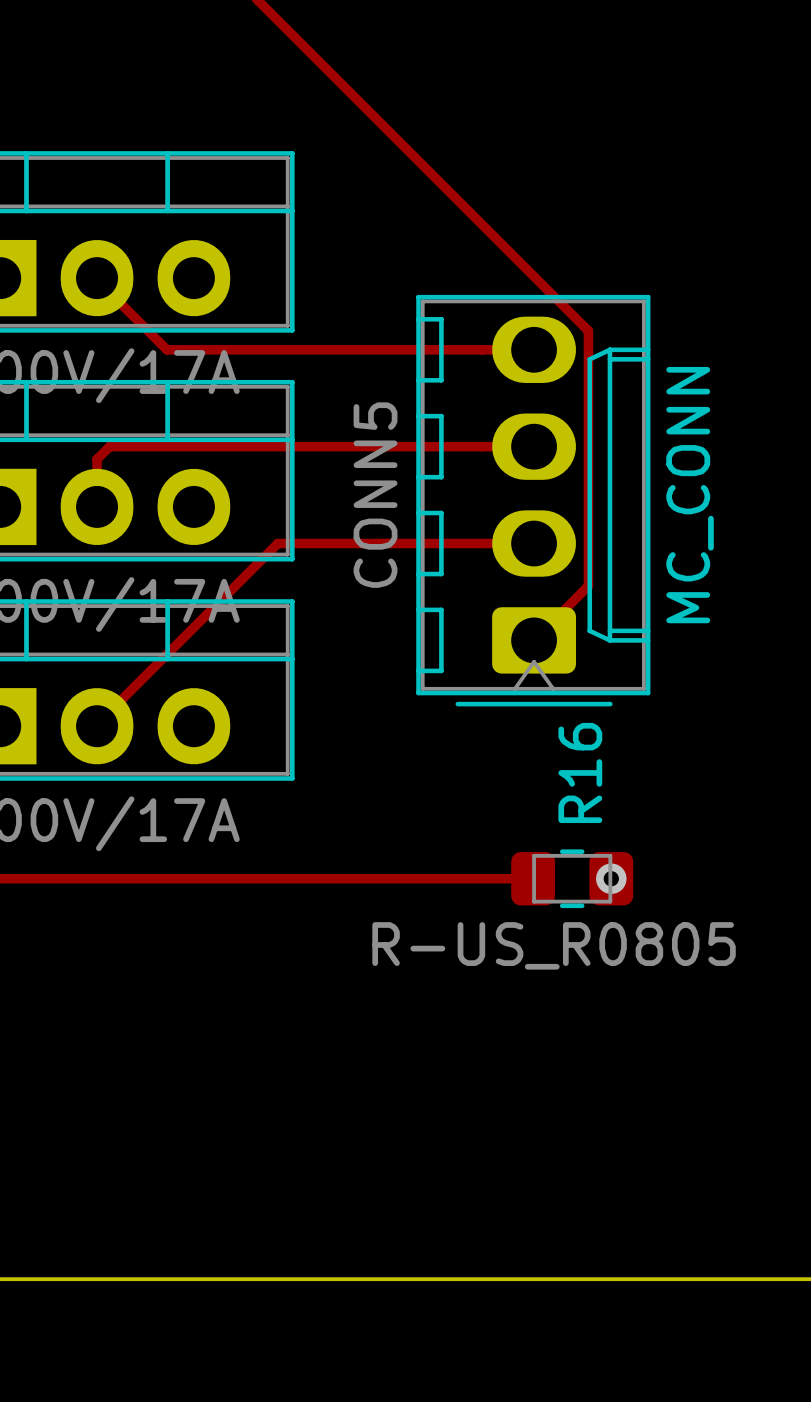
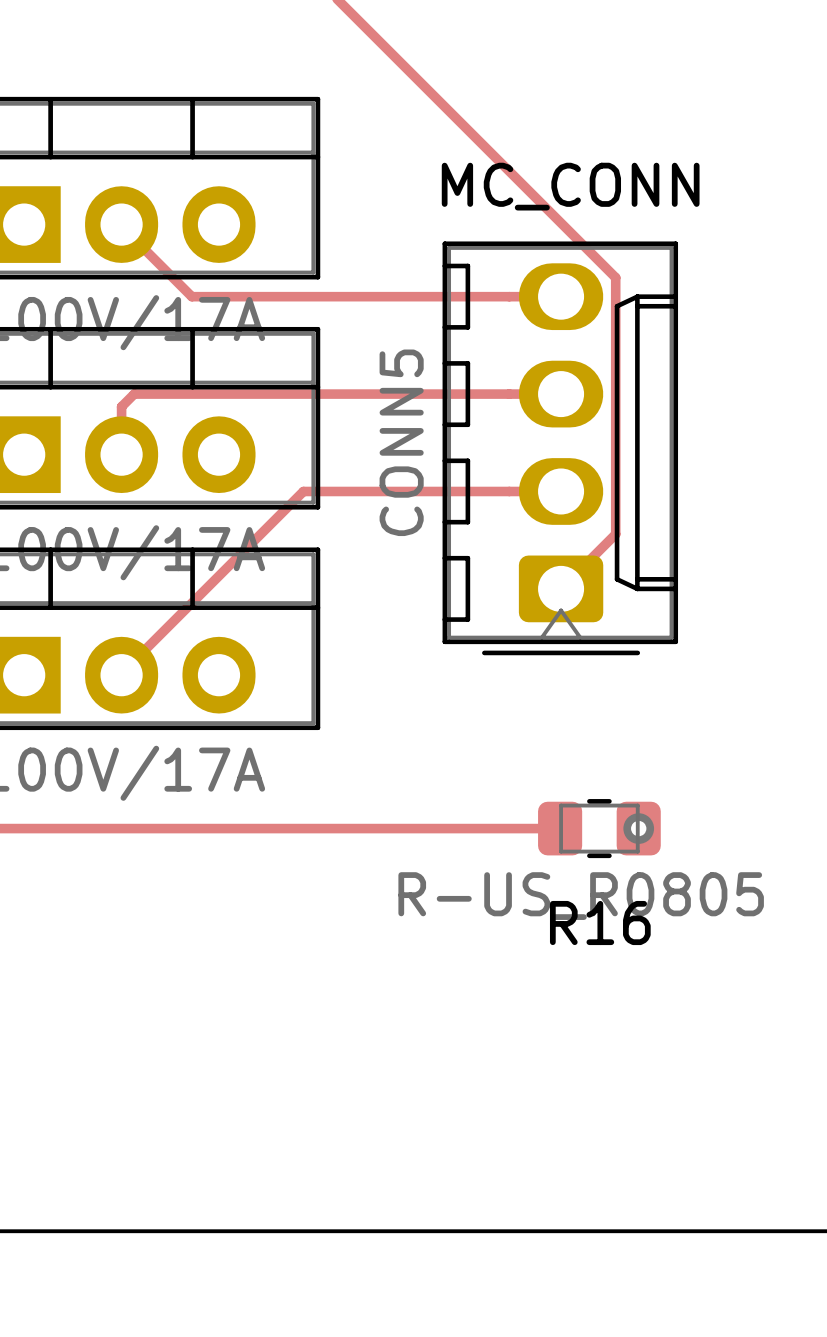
CONN5 value rotation: 0° (690, 495) -> 90° clockwise (570, 186)
R16 name rotation: 0° (580, 772) -> 90° clockwise (600, 923)
R16 name position: R16 (580, 772) -> R16 (600, 923)

